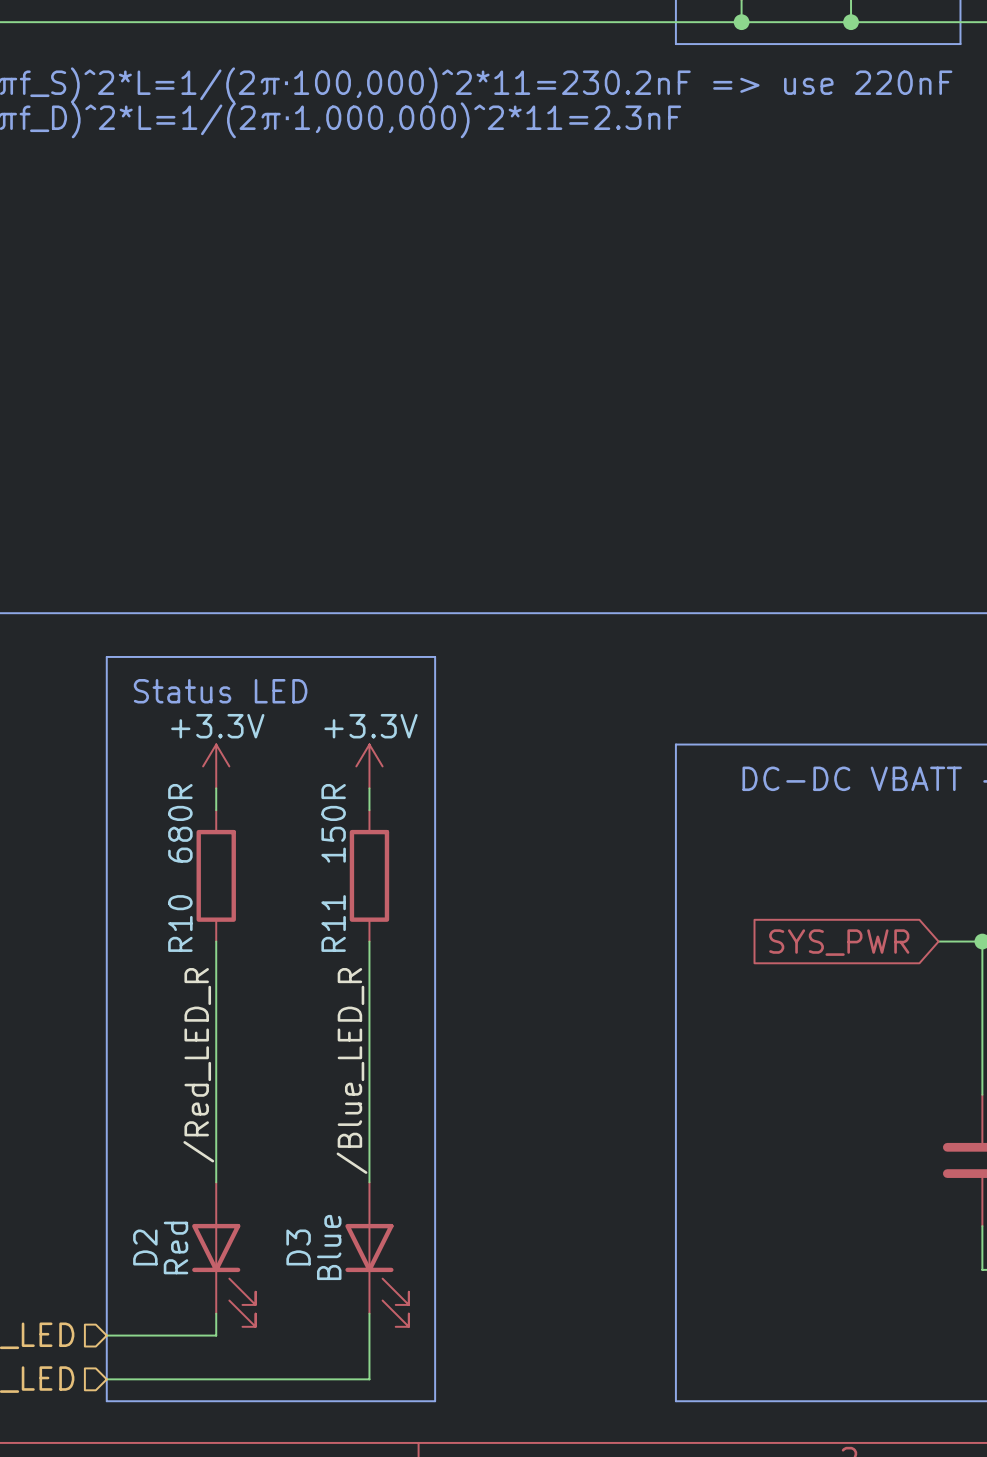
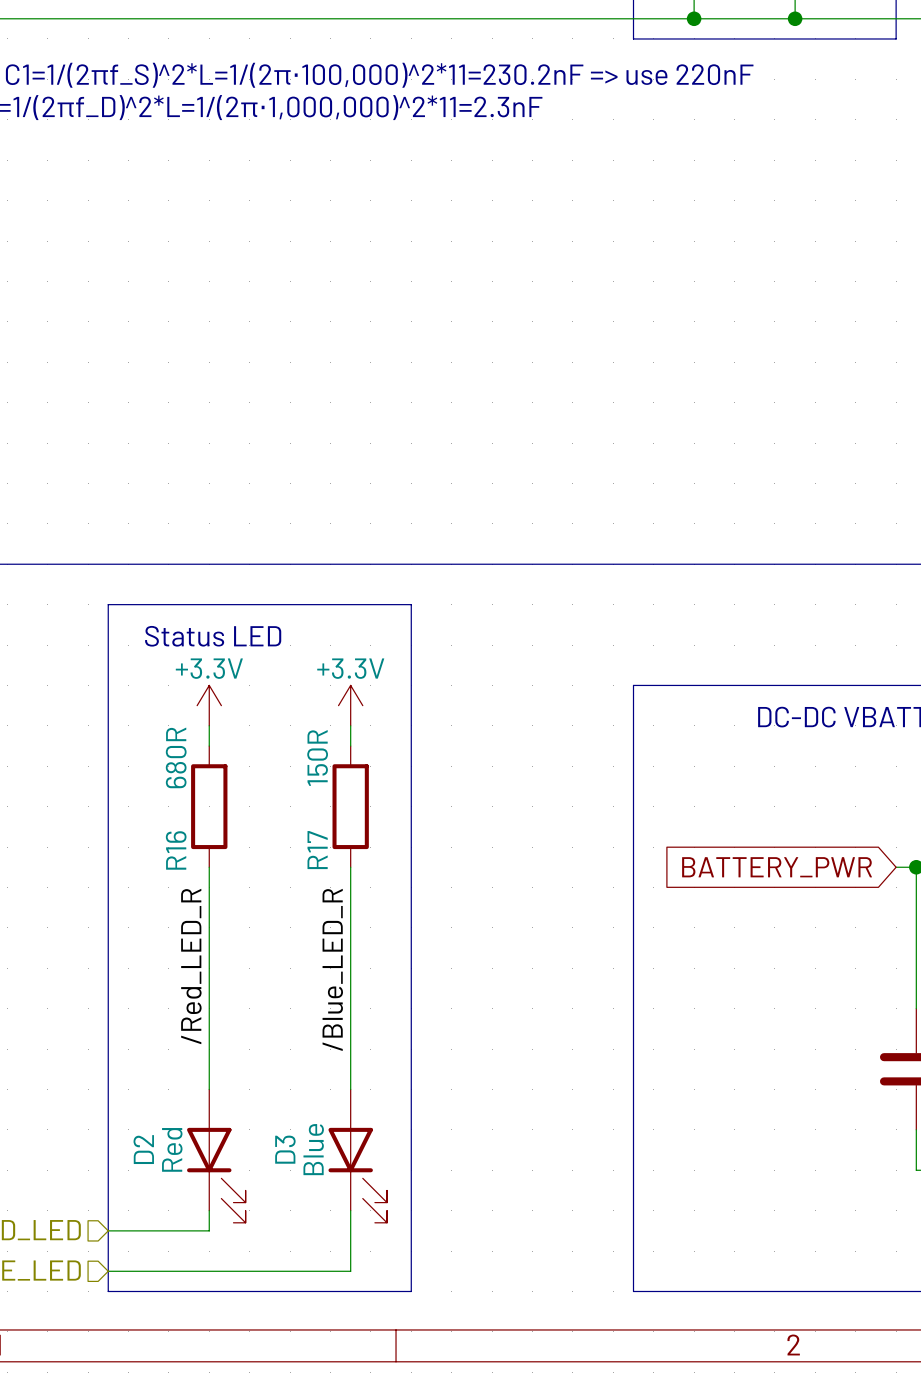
R10 name: R10 (180, 923) -> R16 (176, 850)
R11 name: R11 (333, 923) -> R17 (317, 850)
wire: (938, 941) (960, 941) -> none
global label: none -> BATTERY_PWR (777, 867)
global label: SYS_PWR (839, 942) -> none

